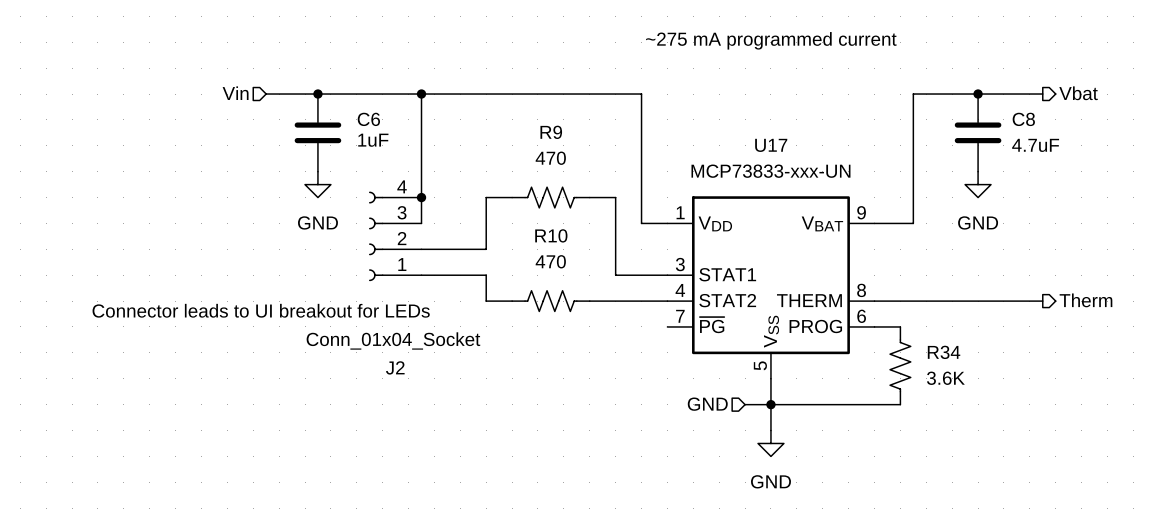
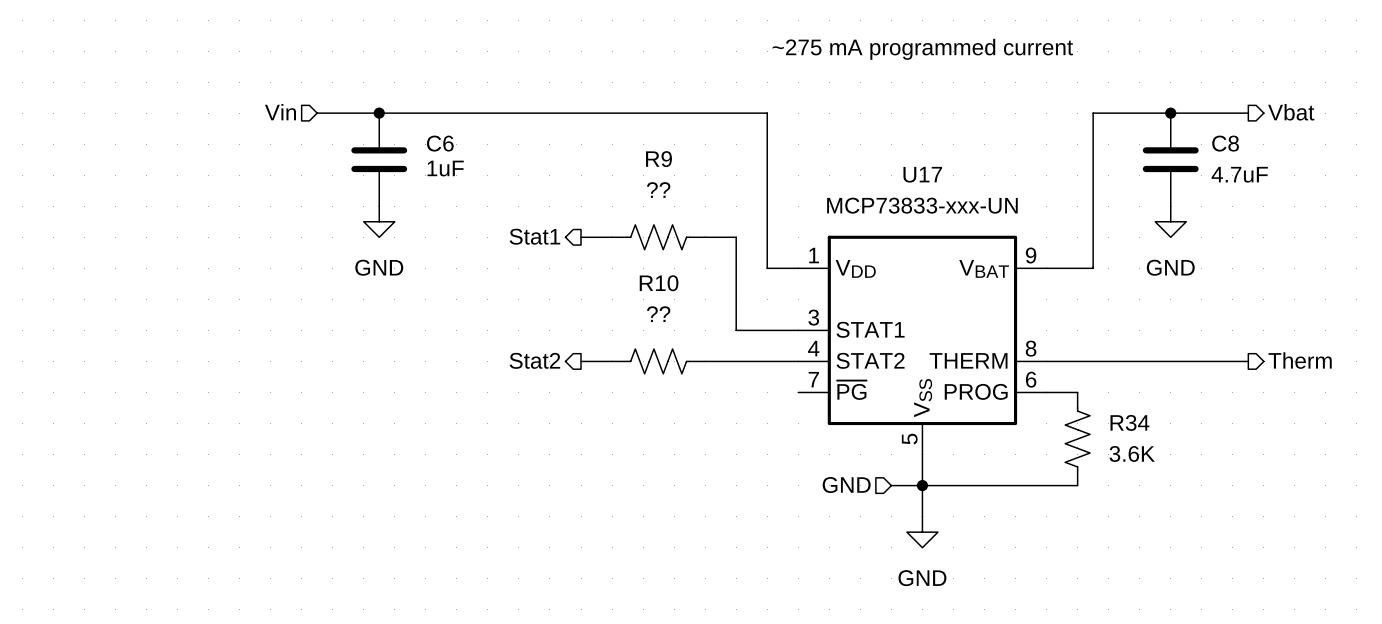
wire: (421, 94) (421, 223) -> none
junction: (421, 94) -> none
R9 value: 470 (550, 158) -> ?? (658, 190)
junction: (421, 197) -> none
hierarchical label: none -> Stat1 (534, 236)
wire: (486, 197) (486, 249) (421, 249) -> none
J2: Conn_01x04_Socket (395, 236) -> none
R10 value: 470 (550, 261) -> ?? (658, 314)
wire: (421, 275) (486, 275) (486, 301) -> none
hierarchical label: none -> Stat2 (534, 360)
text: Connector leads to UI breakout for LEDs (261, 310) -> none

